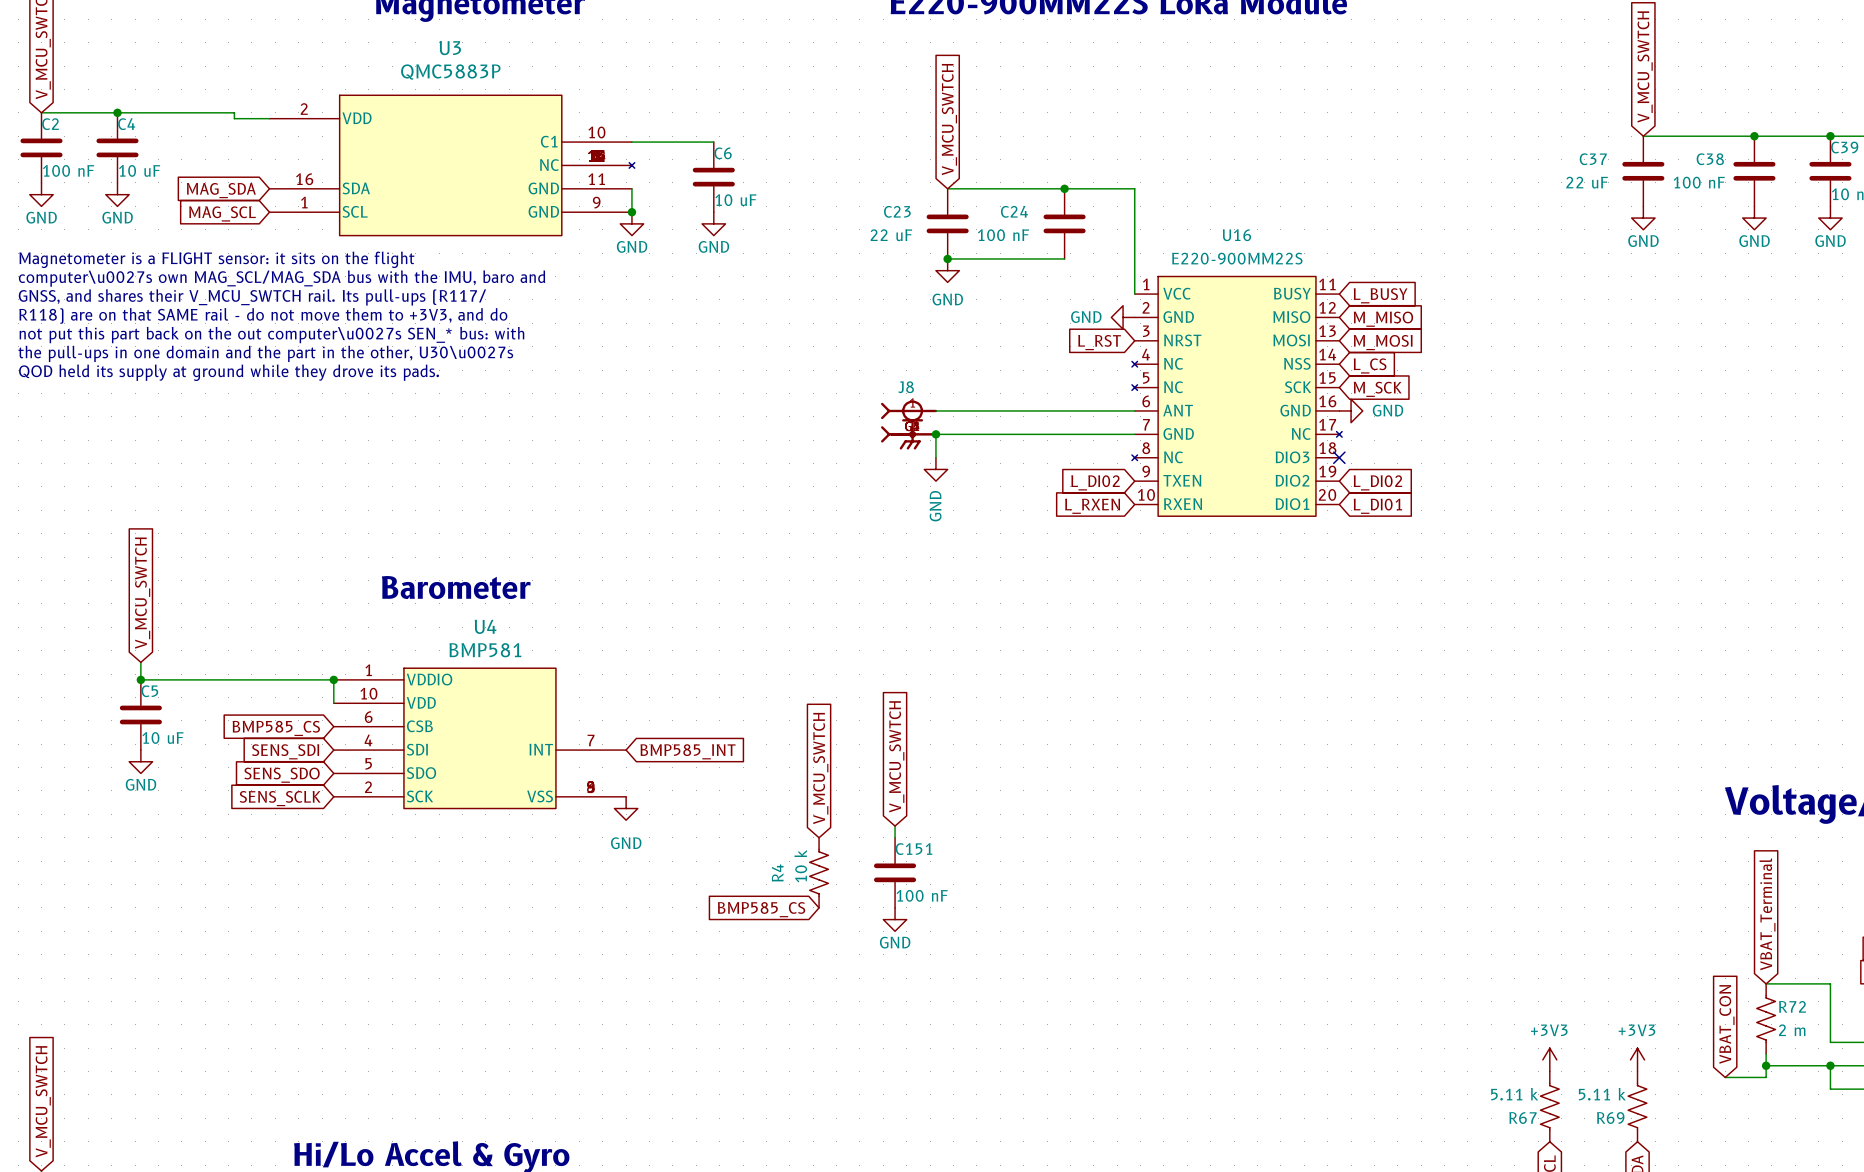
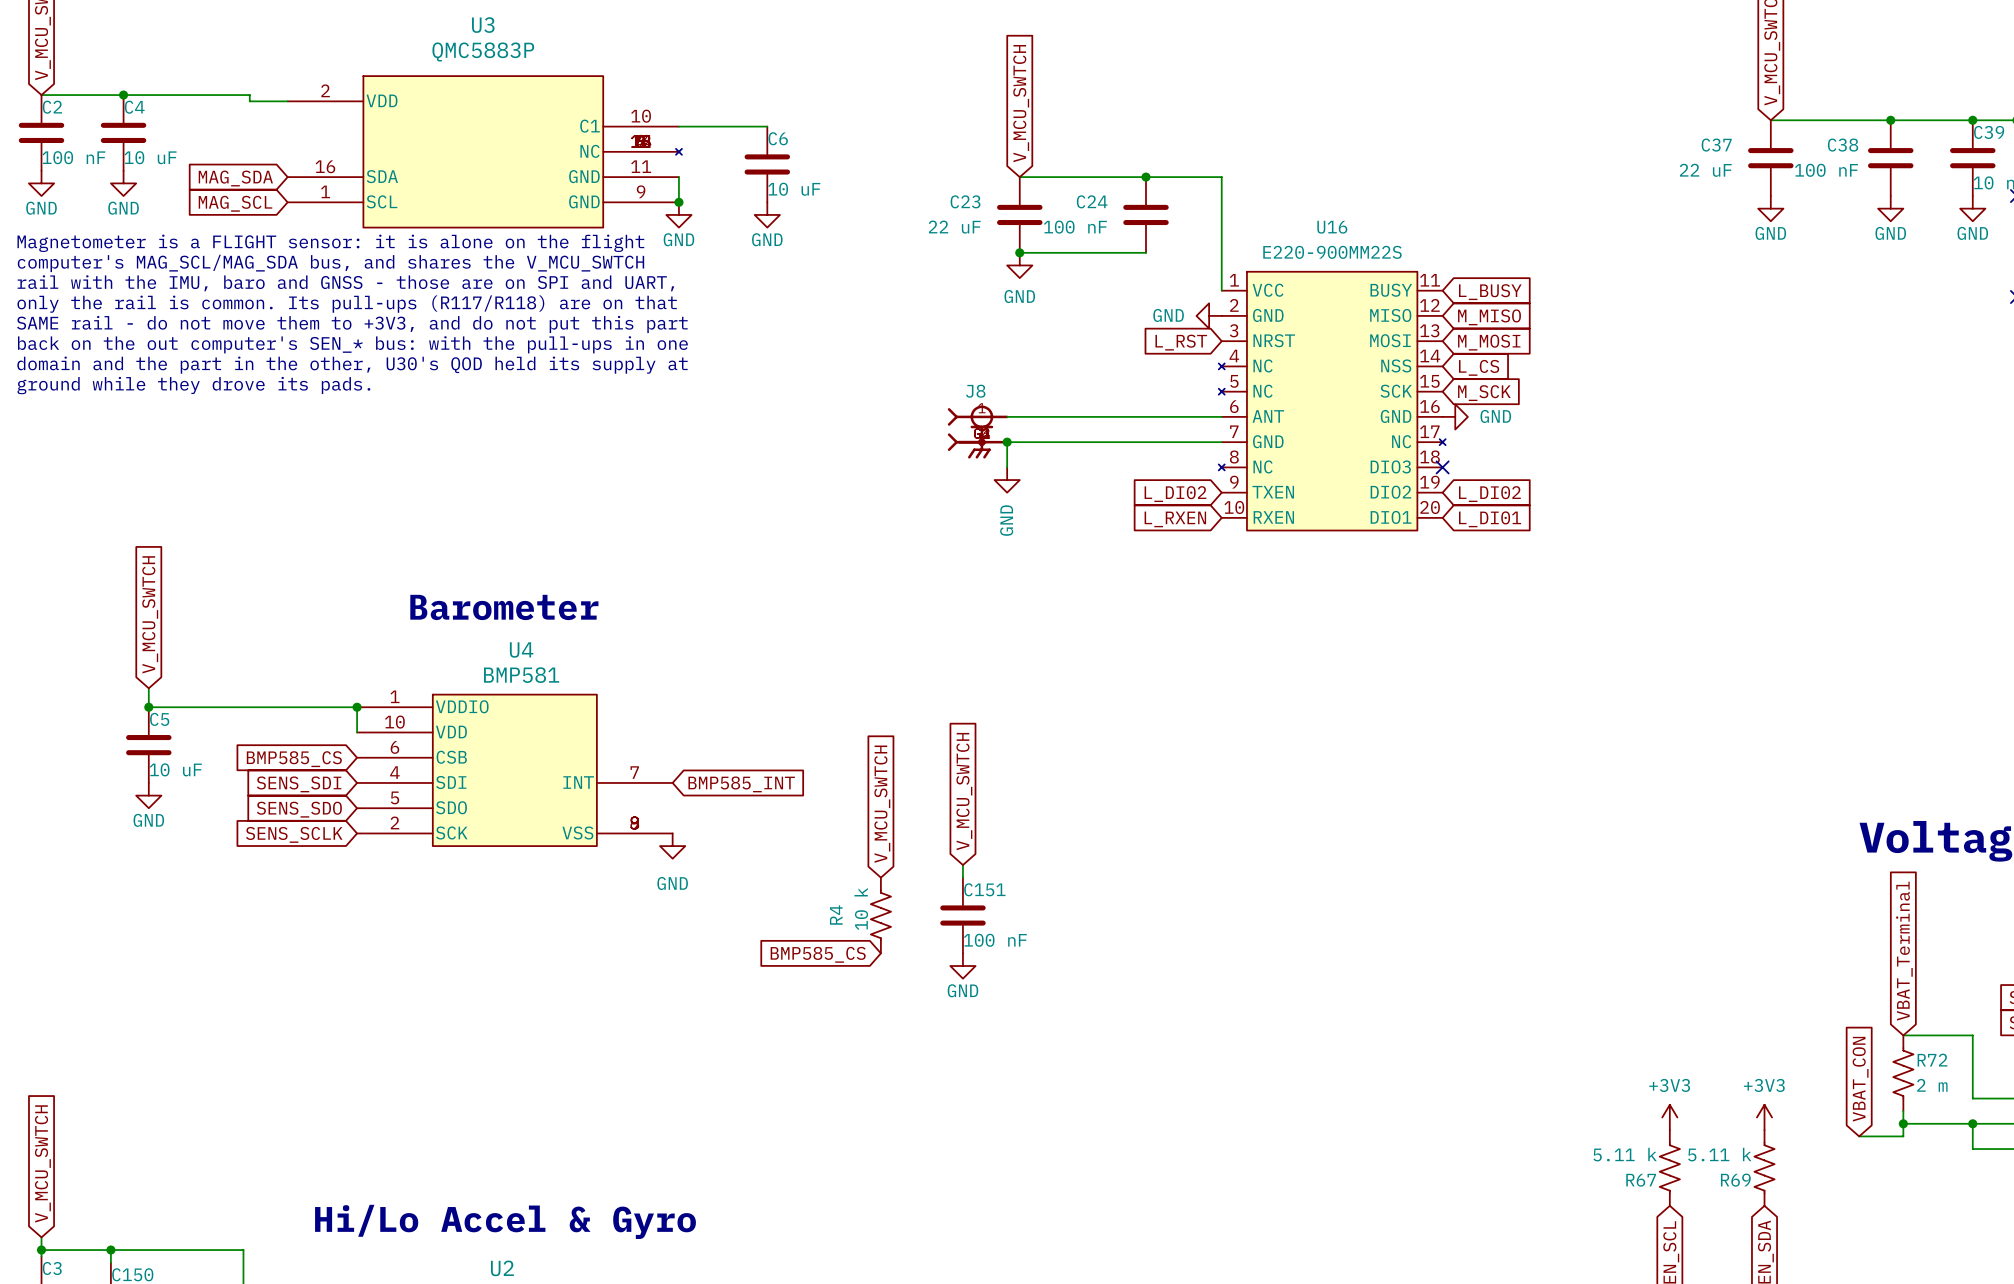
text: Magnetometer is a FLIGHT sensor: it sits on the flight (216, 259) -> Magnetometer is a FLIGHT sensor: it is alone on the flight (330, 243)
text: computer\u0027s own MAG_SCL/MAG_SDA bus with the IMU, baro and (282, 278) -> computer's MAG_SCL/MAG_SDA bus, and shares the V_MCU_SWTCH (330, 263)
text: none -> rail with the IMU, baro and GNSS - those are on SPI and UART, (345, 283)
text: GNSS, and shares their V_MCU_SWTCH rail. Its pull-ups (R117/ (252, 297) -> none
text: none -> only the rail is common. Its pull-ups (R117/R118) are on that (347, 304)
text: R118) are on that SAME rail - do not move them to +3V3, and do (263, 315) -> SAME rail - do not move them to +3V3, and do not put this part (352, 324)
text: not put this part back on the out computer\u0027s SEN_* bus: with (271, 335) -> back on the out computer's SEN_* bus: with the pull-ups in one (352, 344)
text: the pull-ups in one domain and the part in the other, U30\u0027s (265, 353) -> domain and the part in the other, U30's QOD held its supply at (352, 365)
text: QOD held its supply at ground while they drove its pads. (229, 372) -> ground while they drove its pads. (193, 385)

